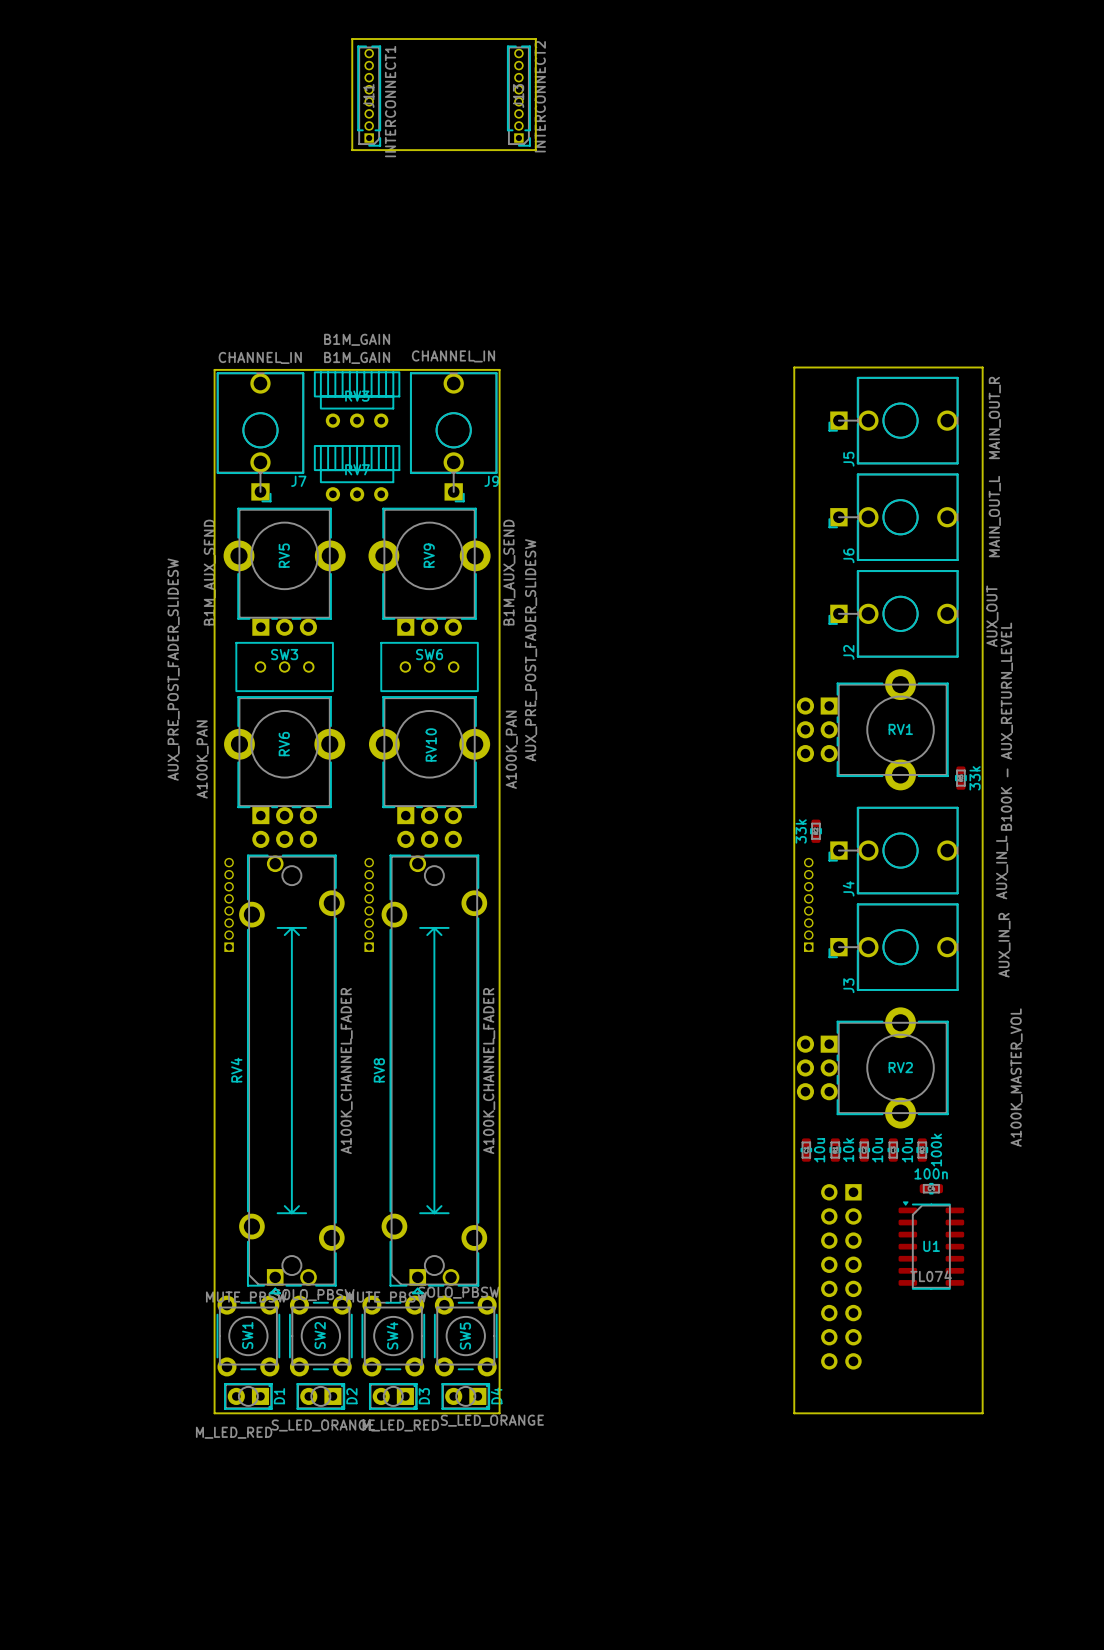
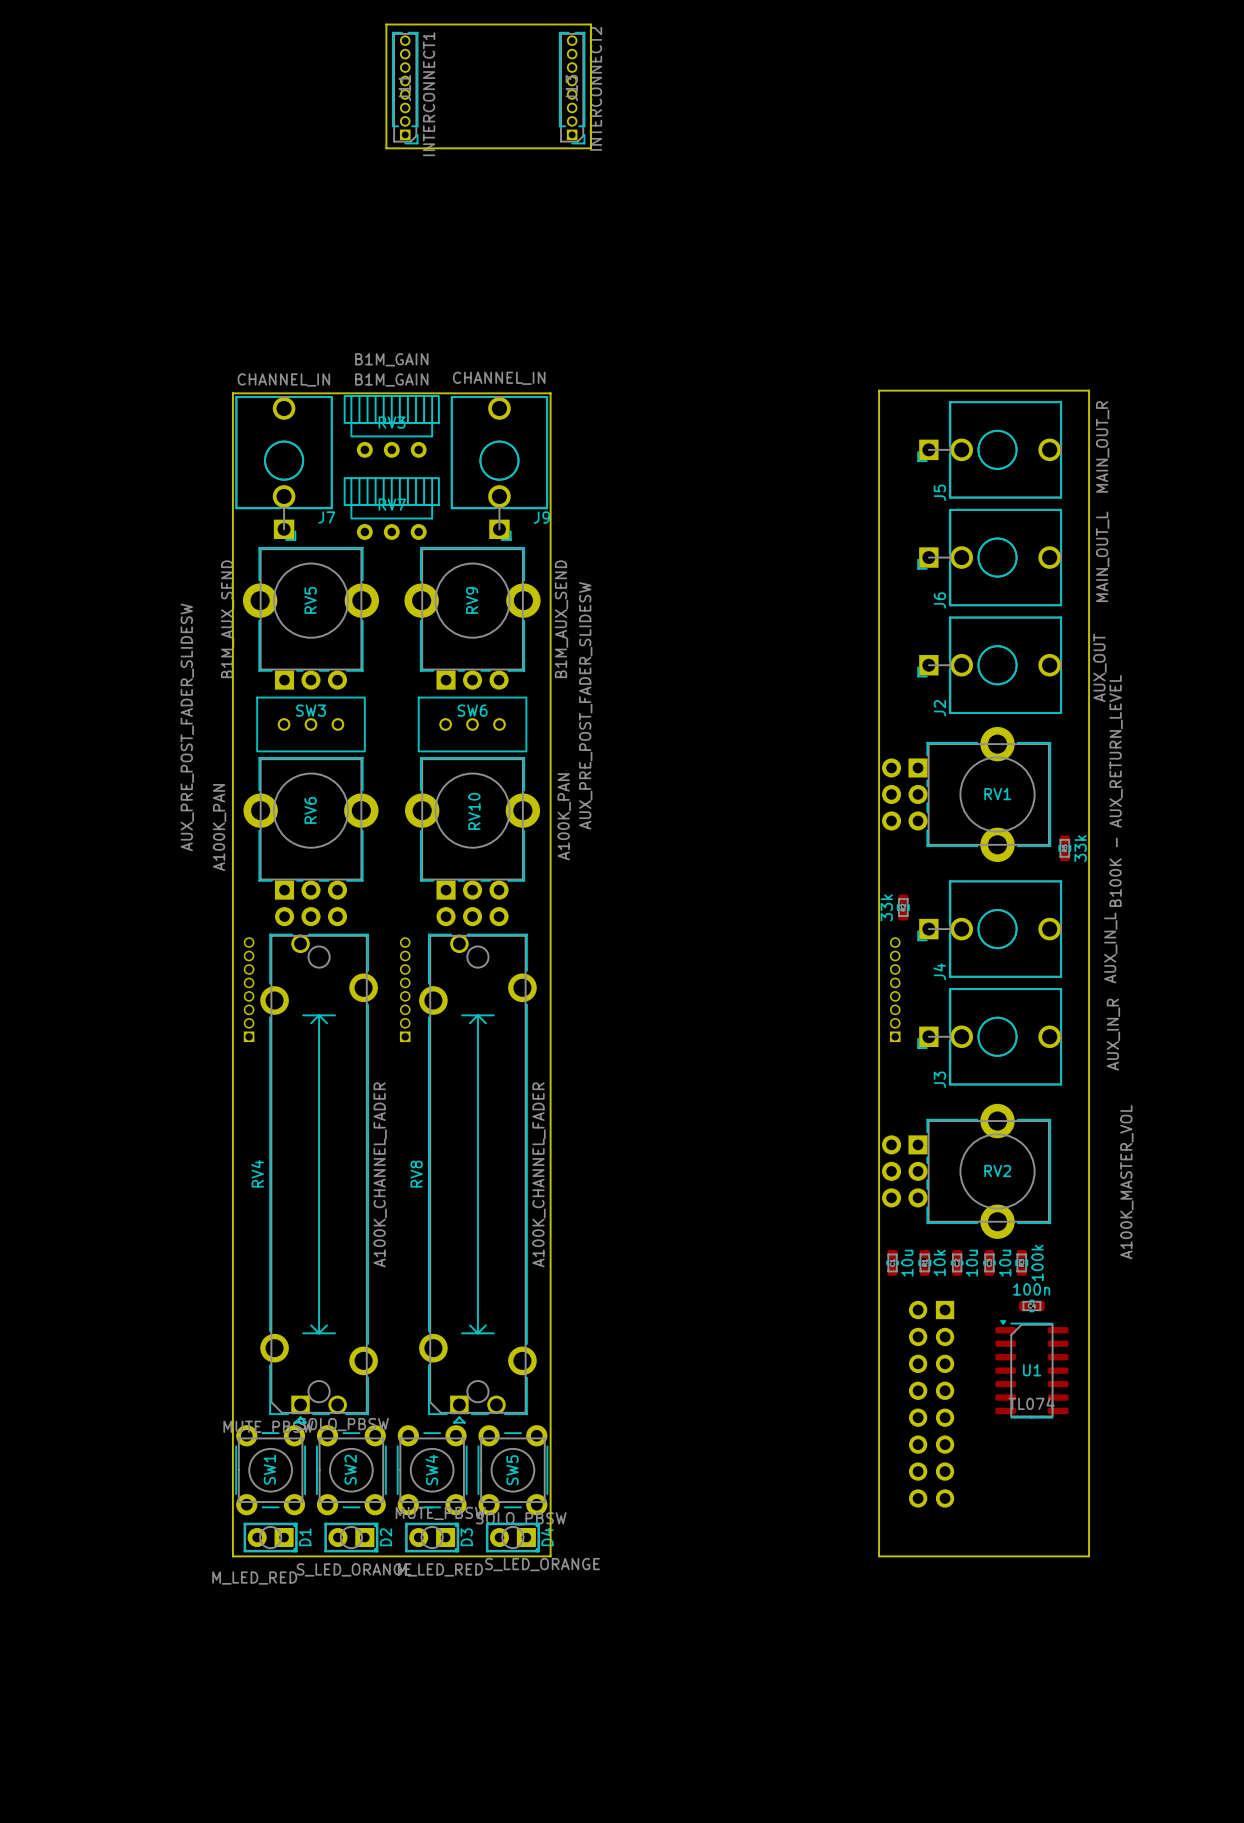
SW4 rotation: 0° (393, 1336) -> 180° (432, 1470)
SW5 rotation: 0° (465, 1336) -> 180° (512, 1470)

